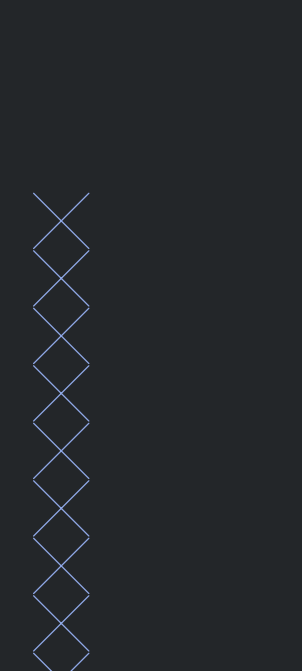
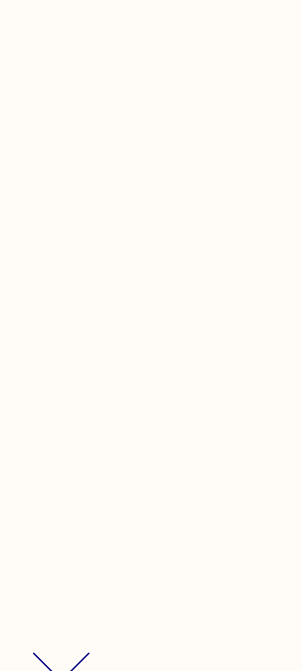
no-connect mark: (61, 220) -> none
no-connect mark: (61, 278) -> none
no-connect mark: (61, 335) -> none
no-connect mark: (61, 393) -> none
no-connect mark: (61, 450) -> none
no-connect mark: (61, 508) -> none
no-connect mark: (61, 565) -> none
no-connect mark: (61, 623) -> none

